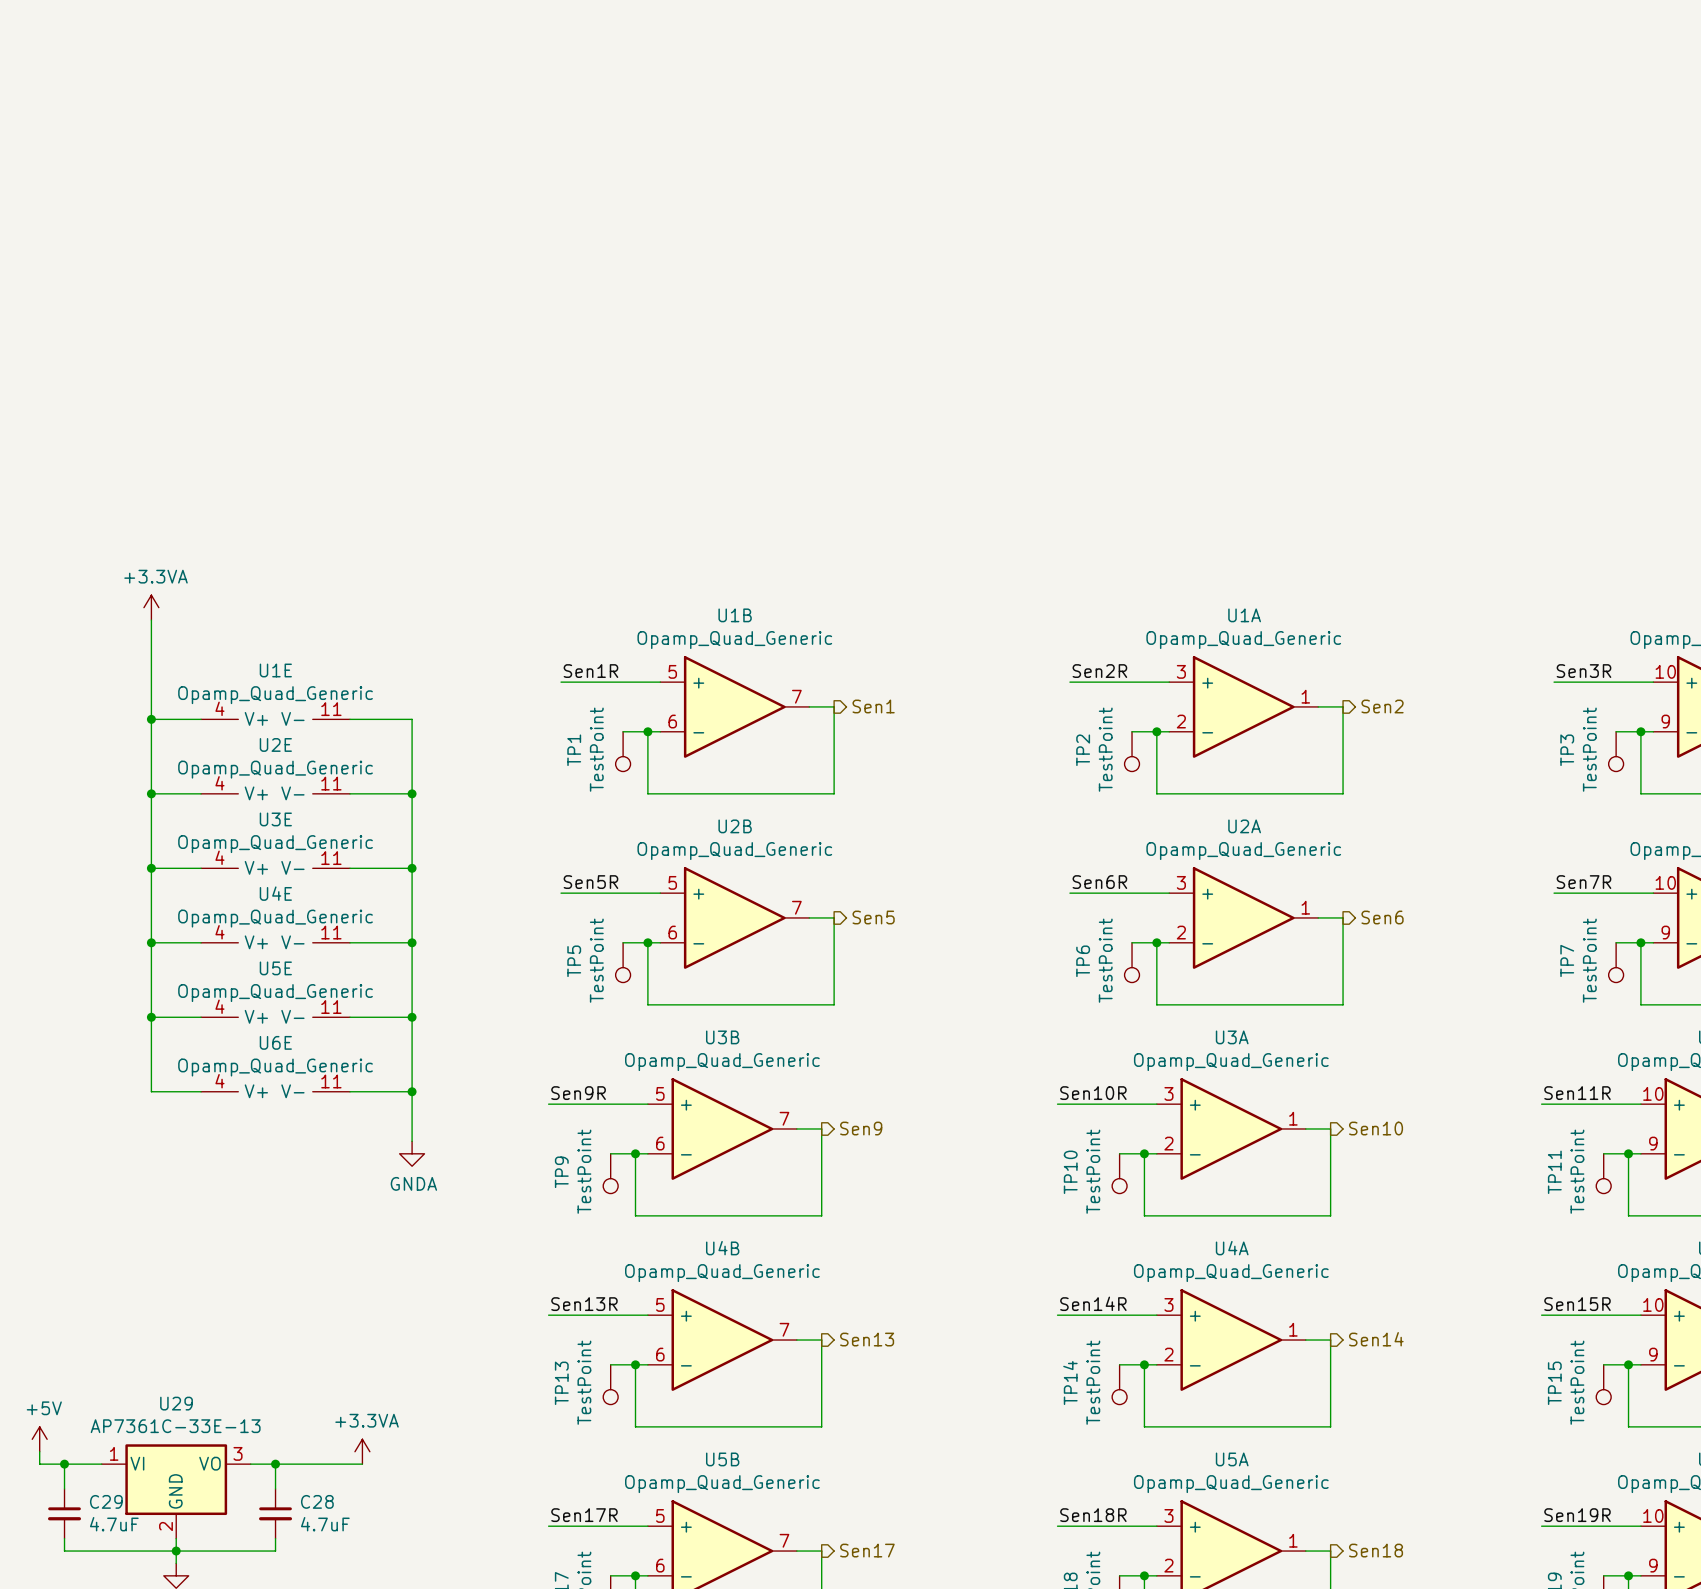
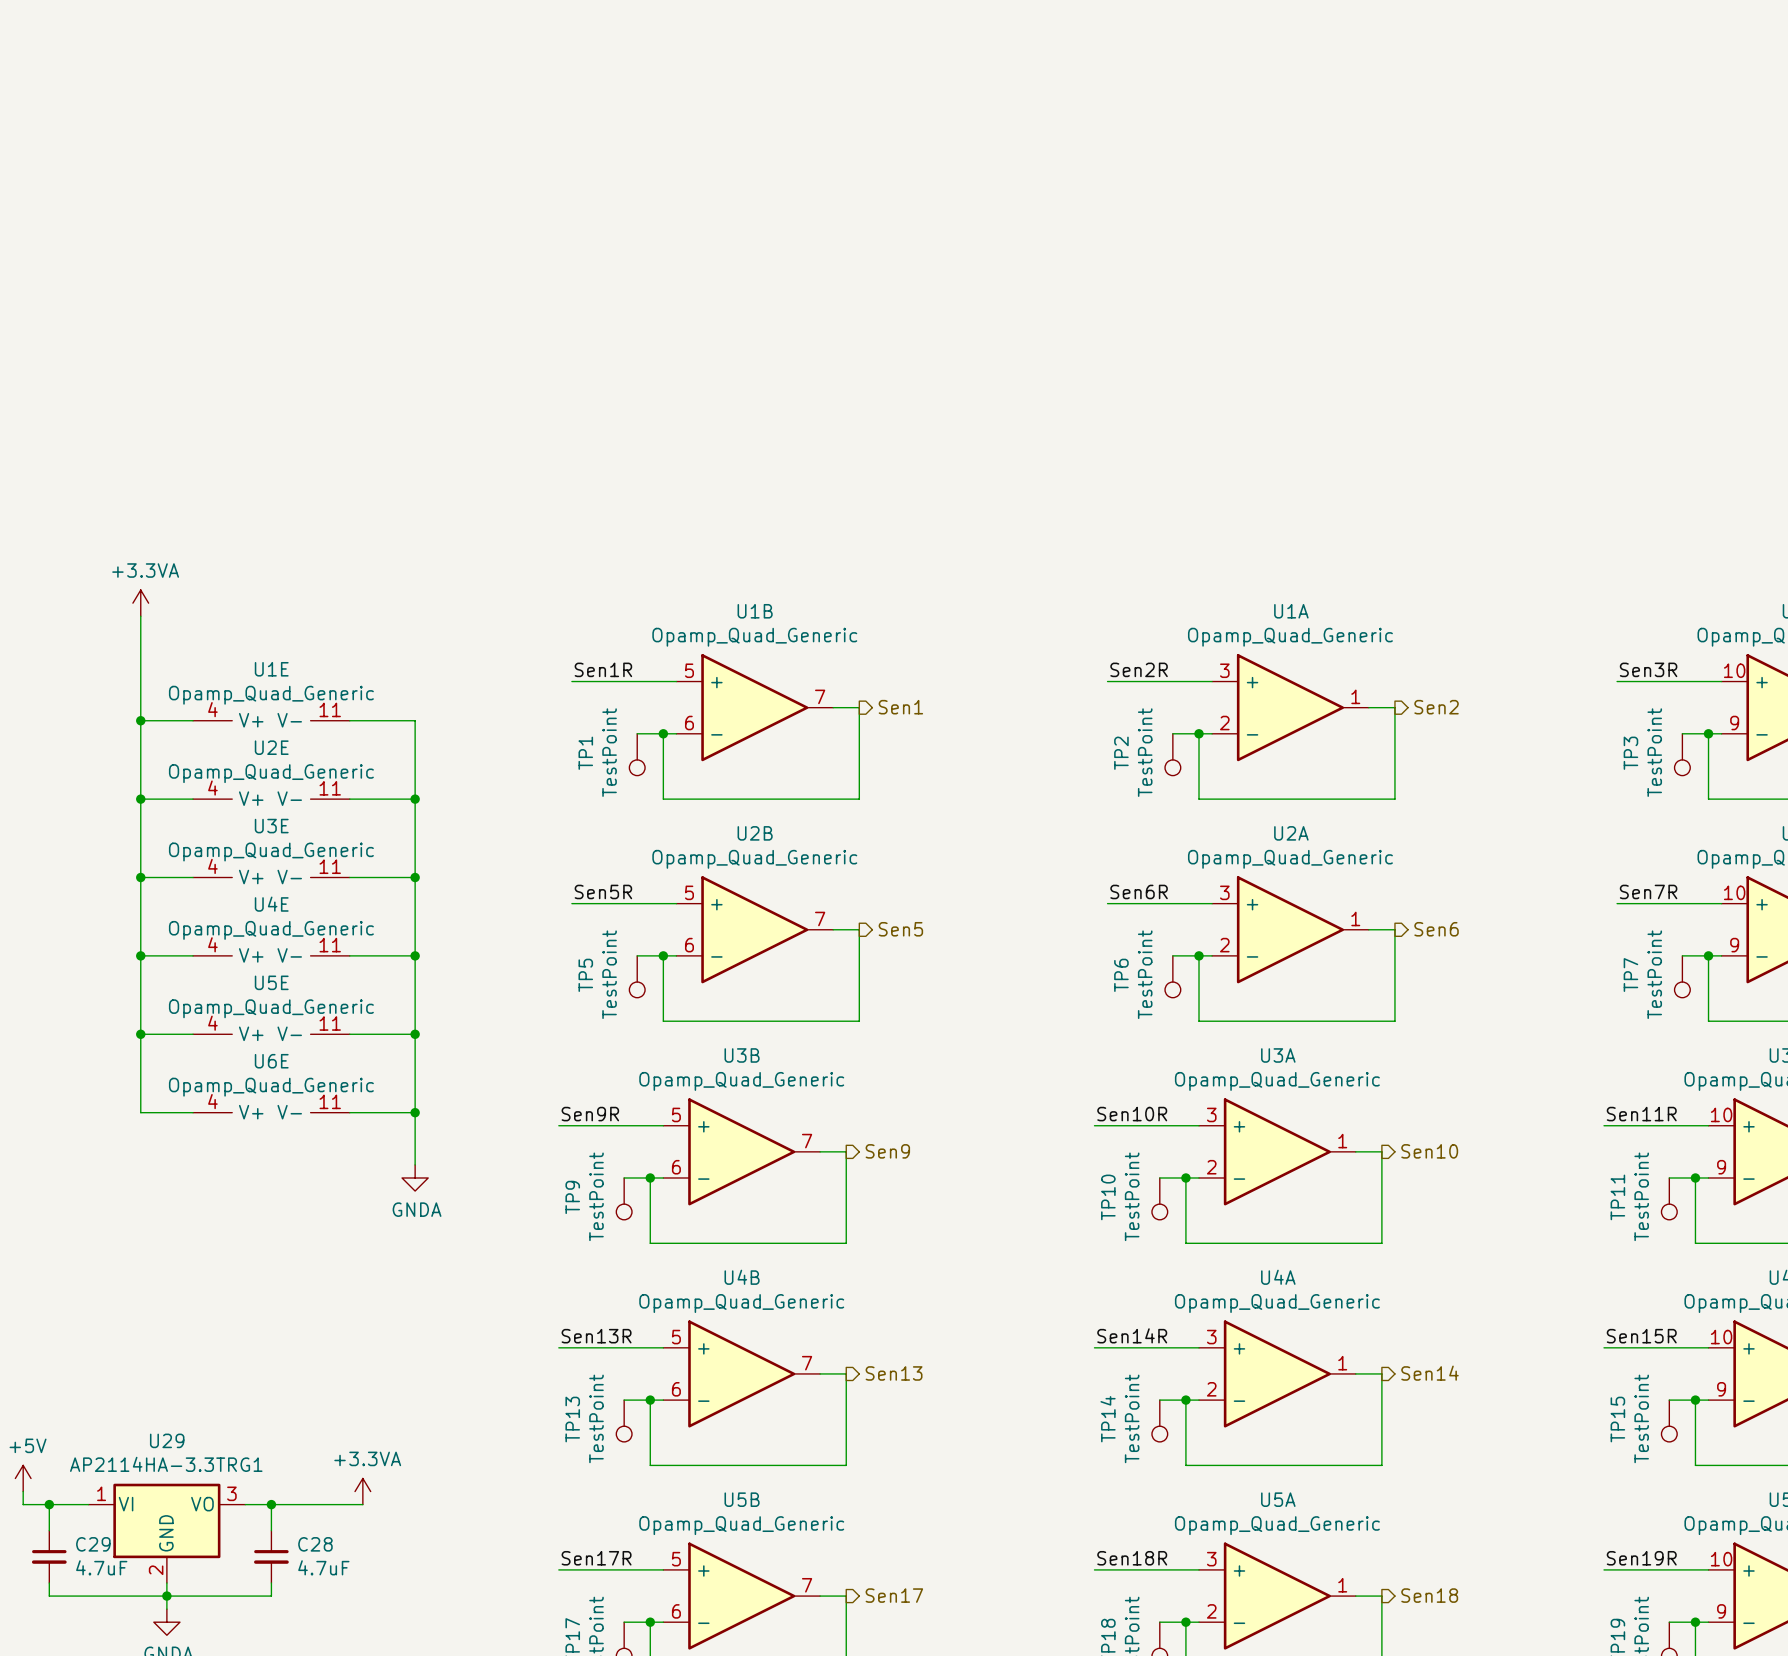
U29 value: AP7361C-33E-13 (175, 1426) -> AP2114HA-3.3TRG1 (166, 1464)

